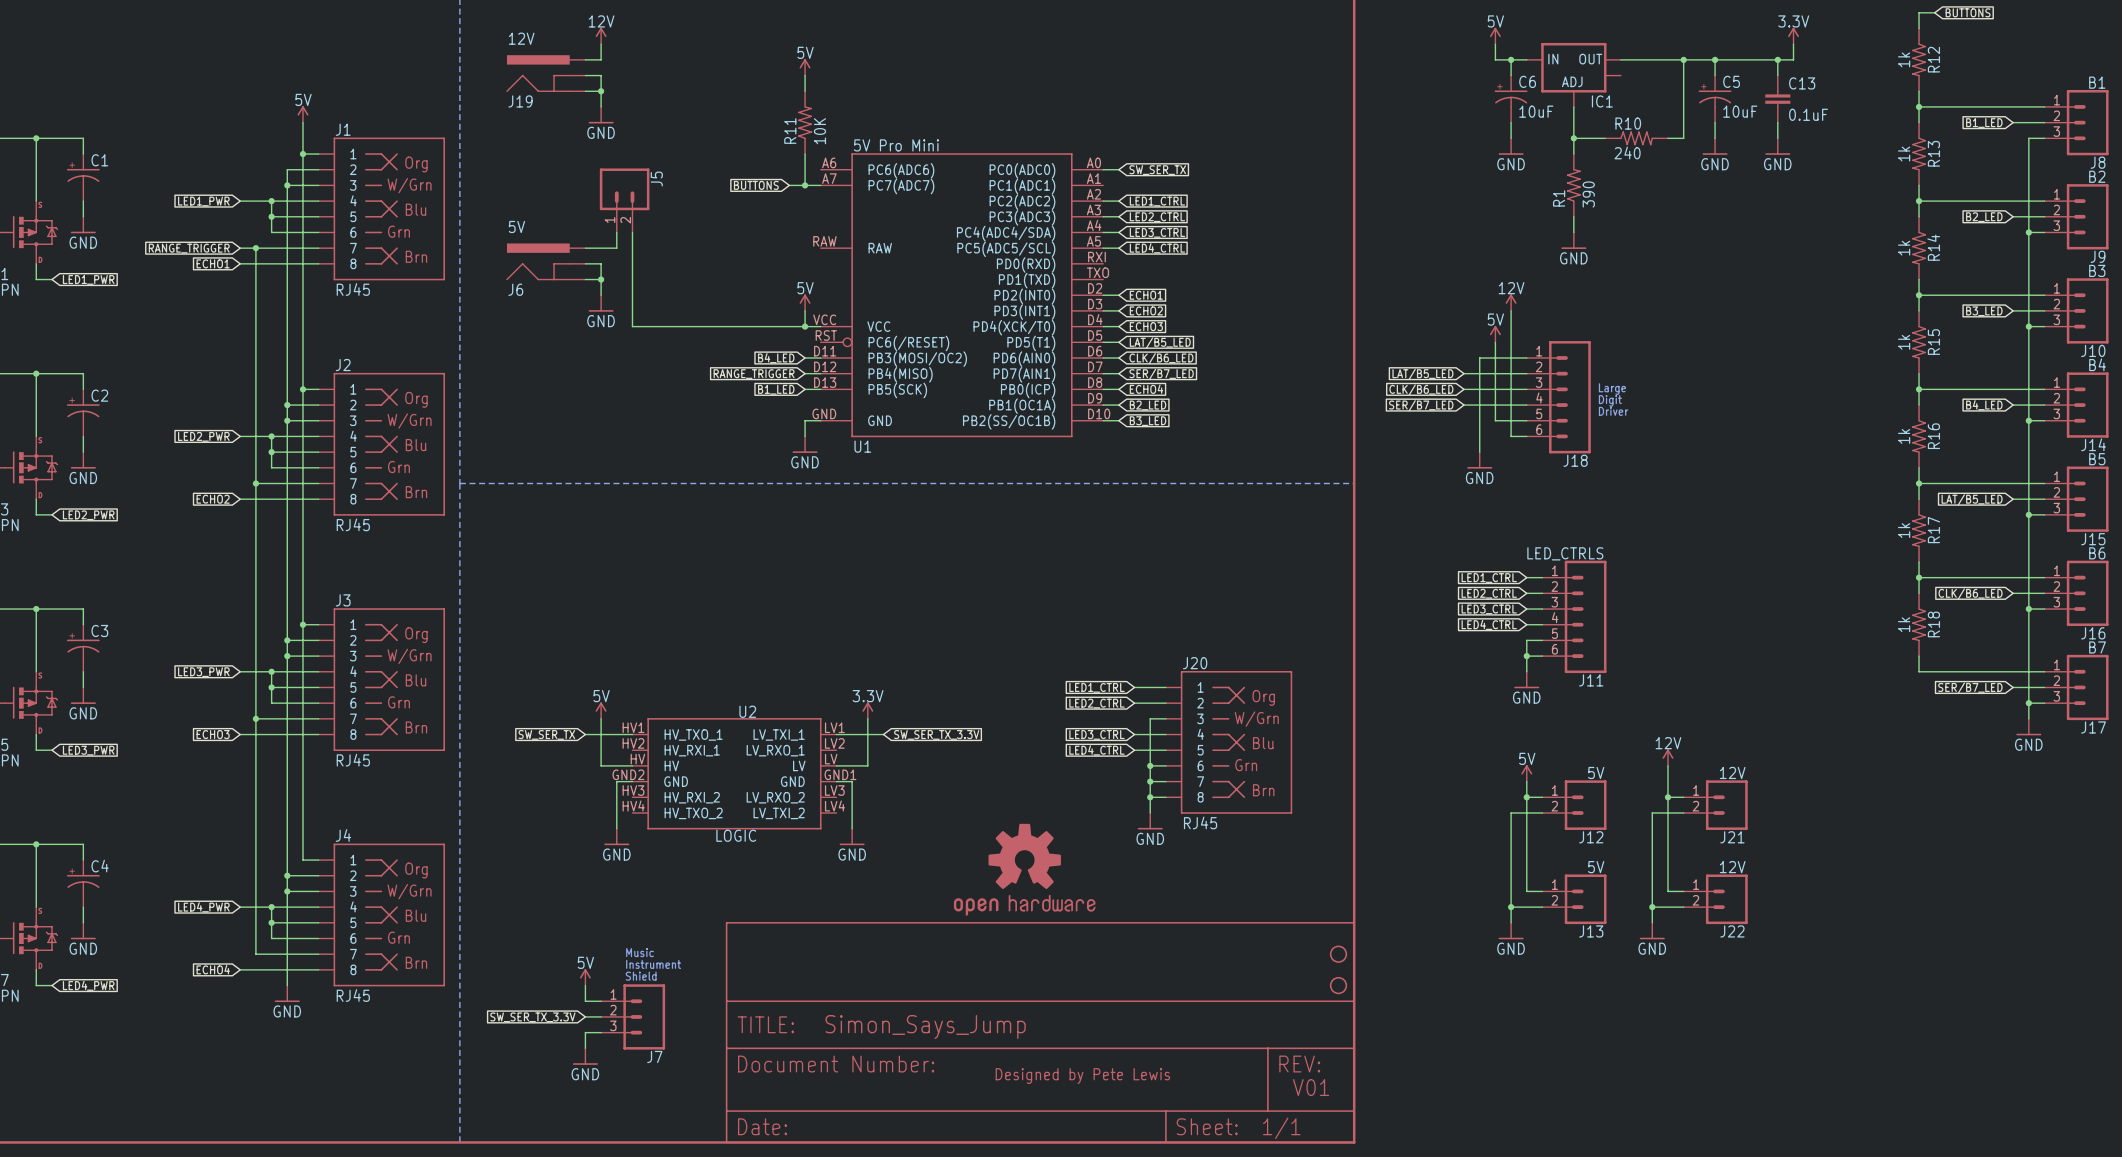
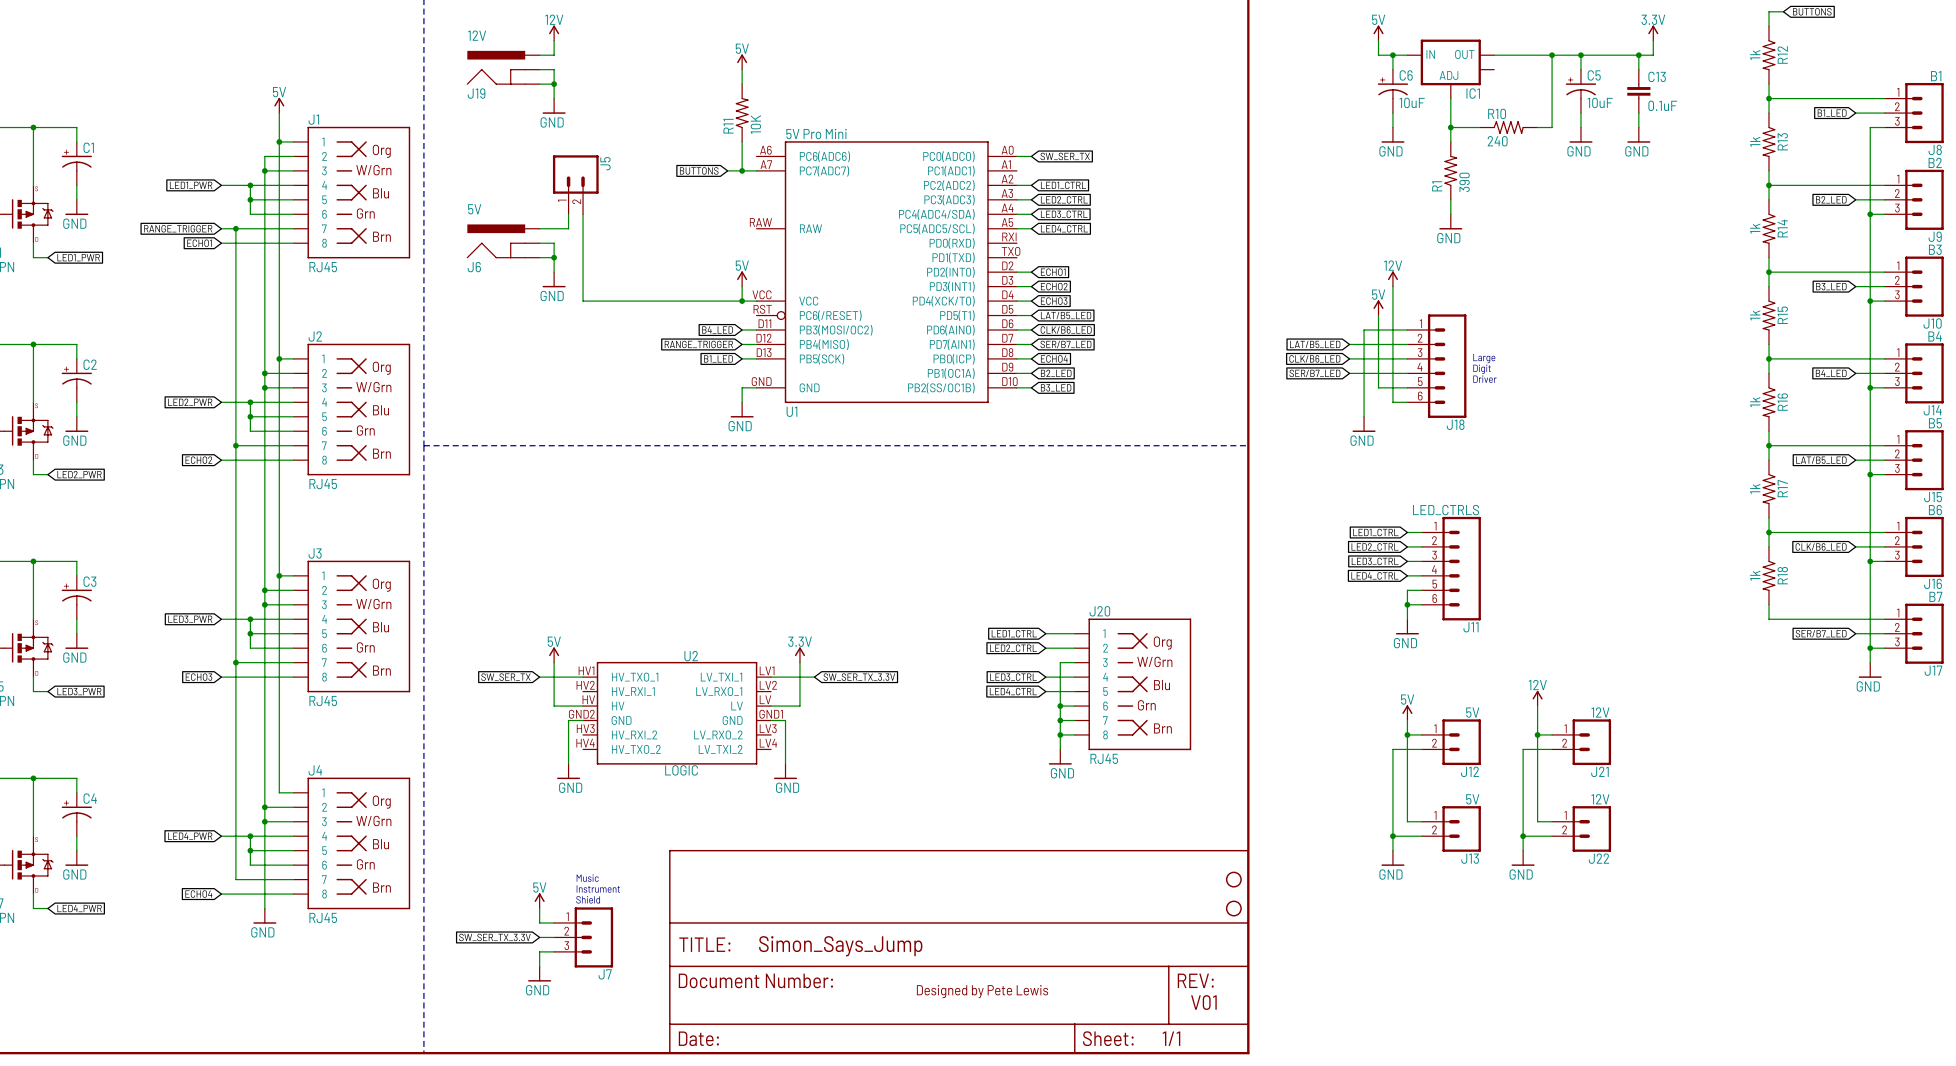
part: (1024, 869) -> none

